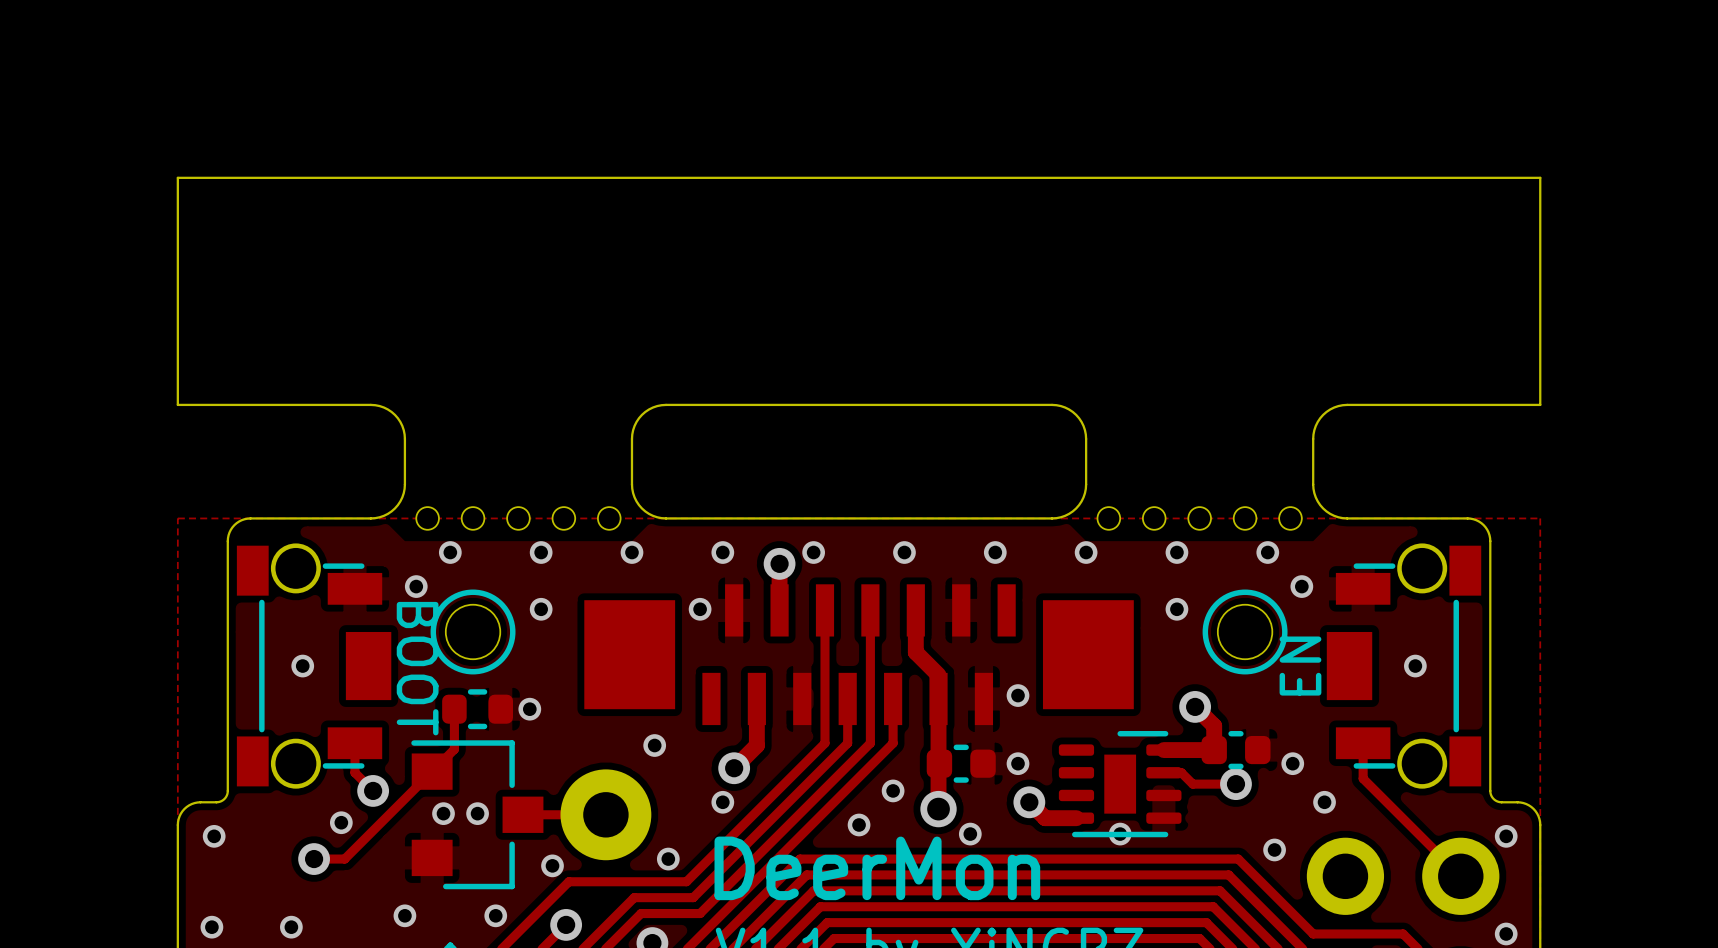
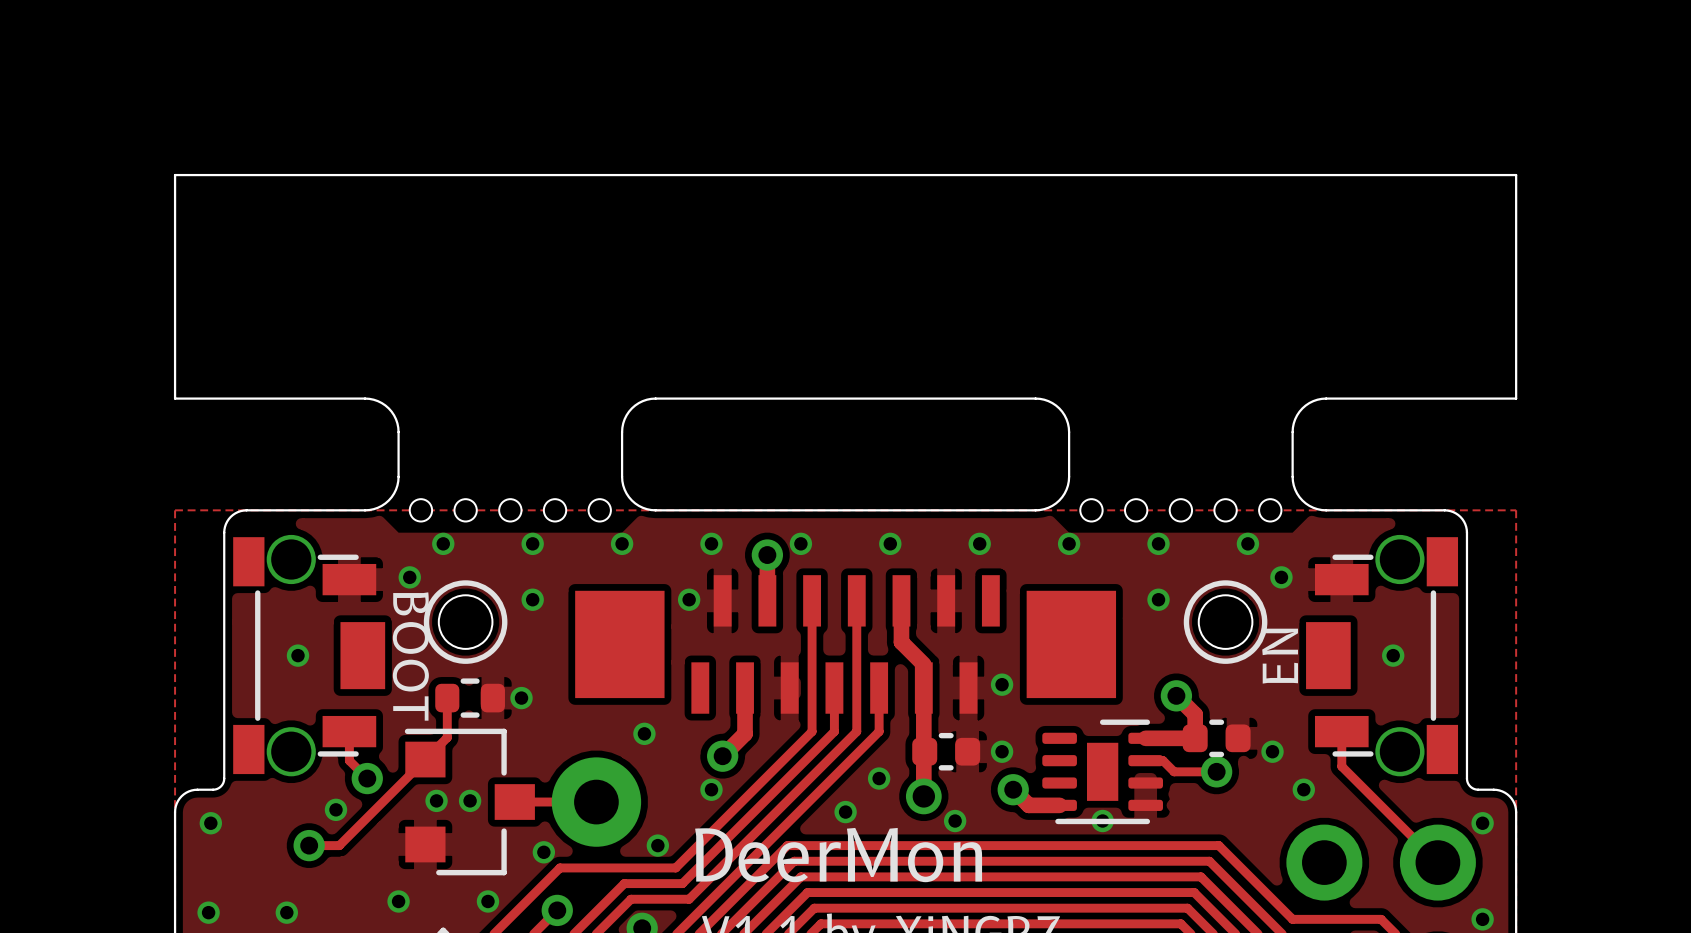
via: (1274, 849) -> none

